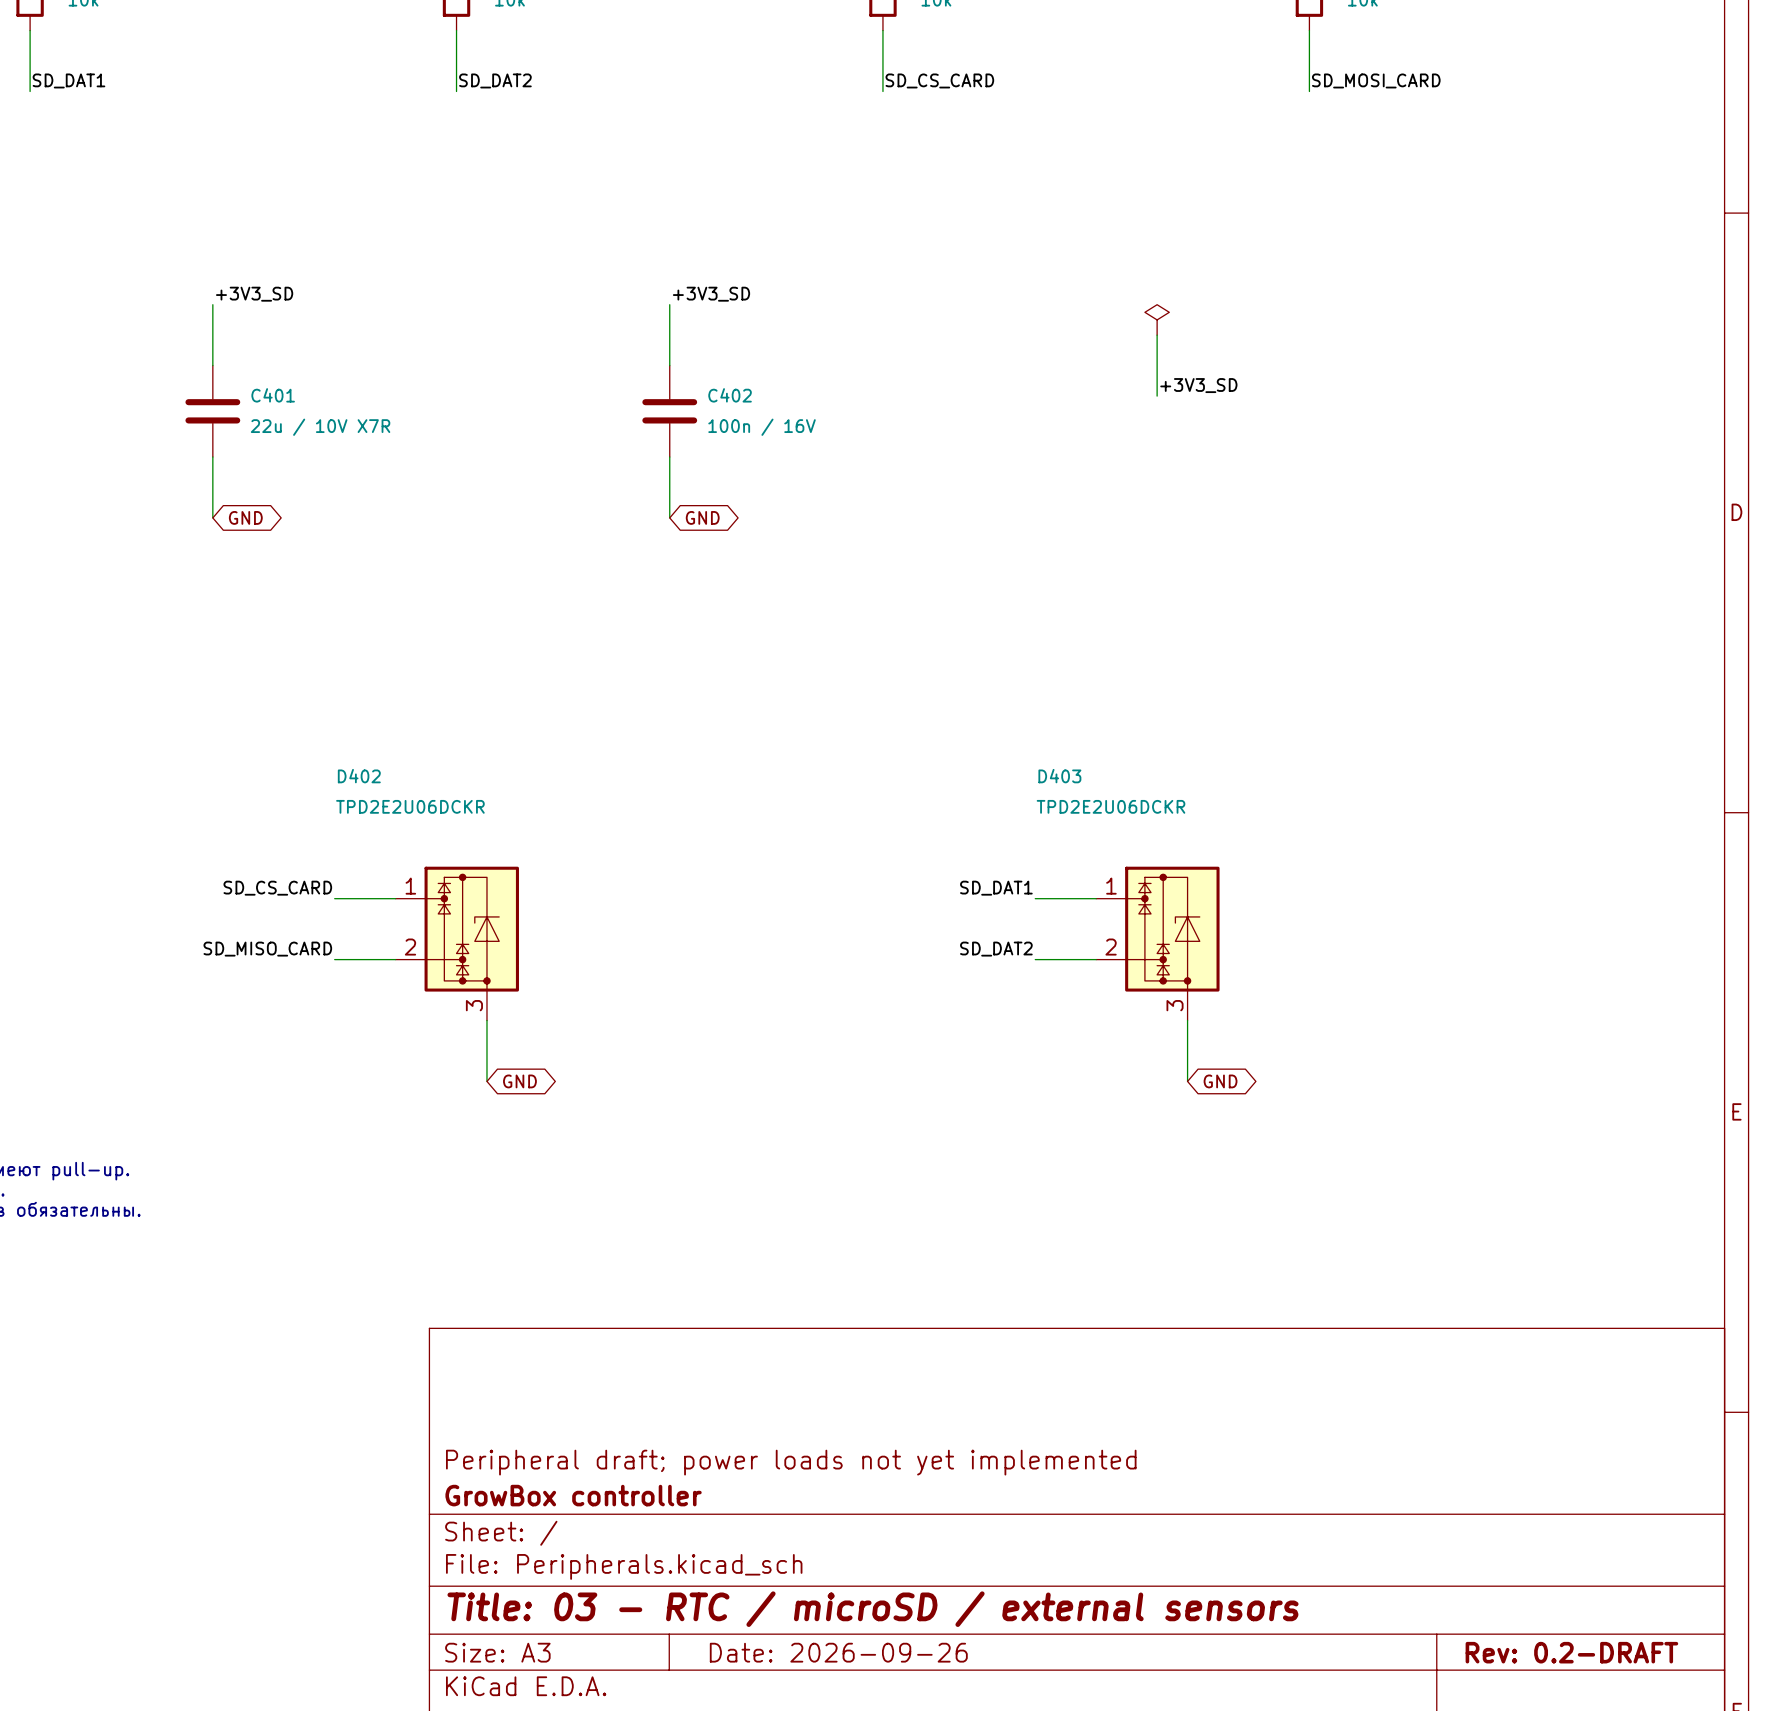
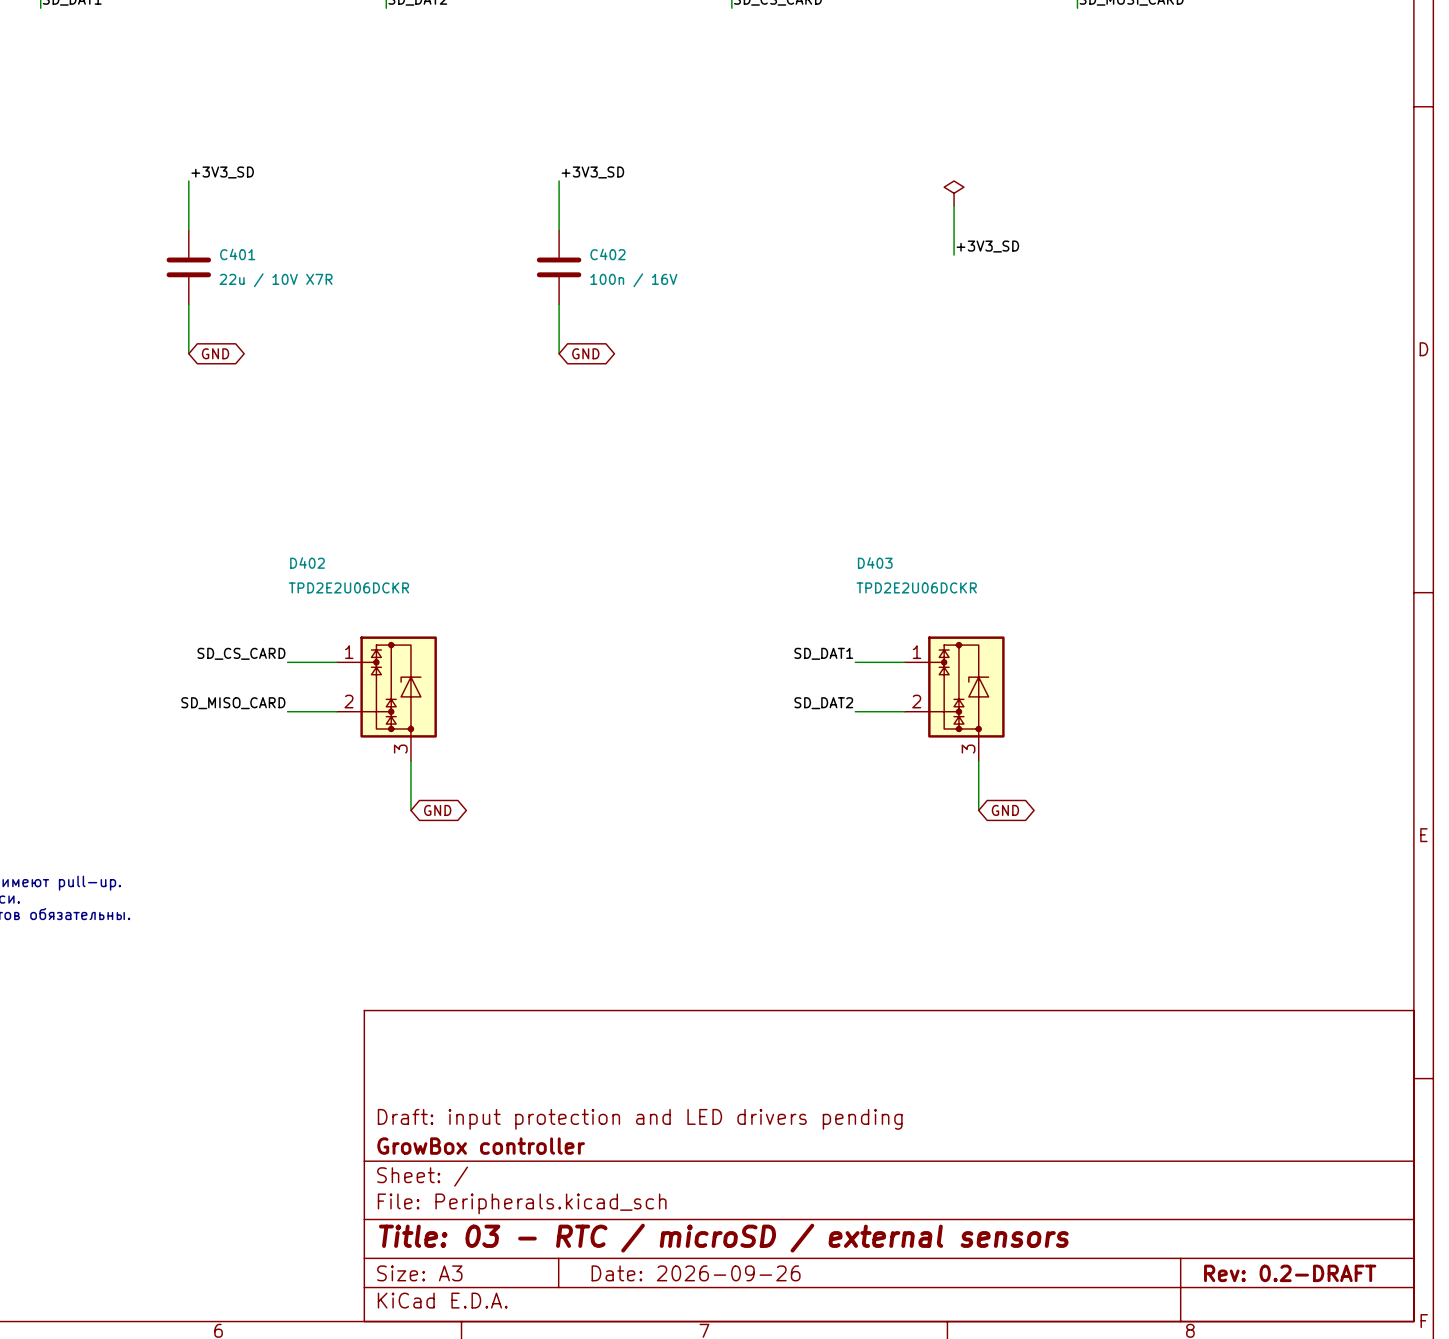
title block: Peripheral draft; power loads not yet implemented (791, 1462) -> Draft: input protection and LED drivers pending (640, 1119)

